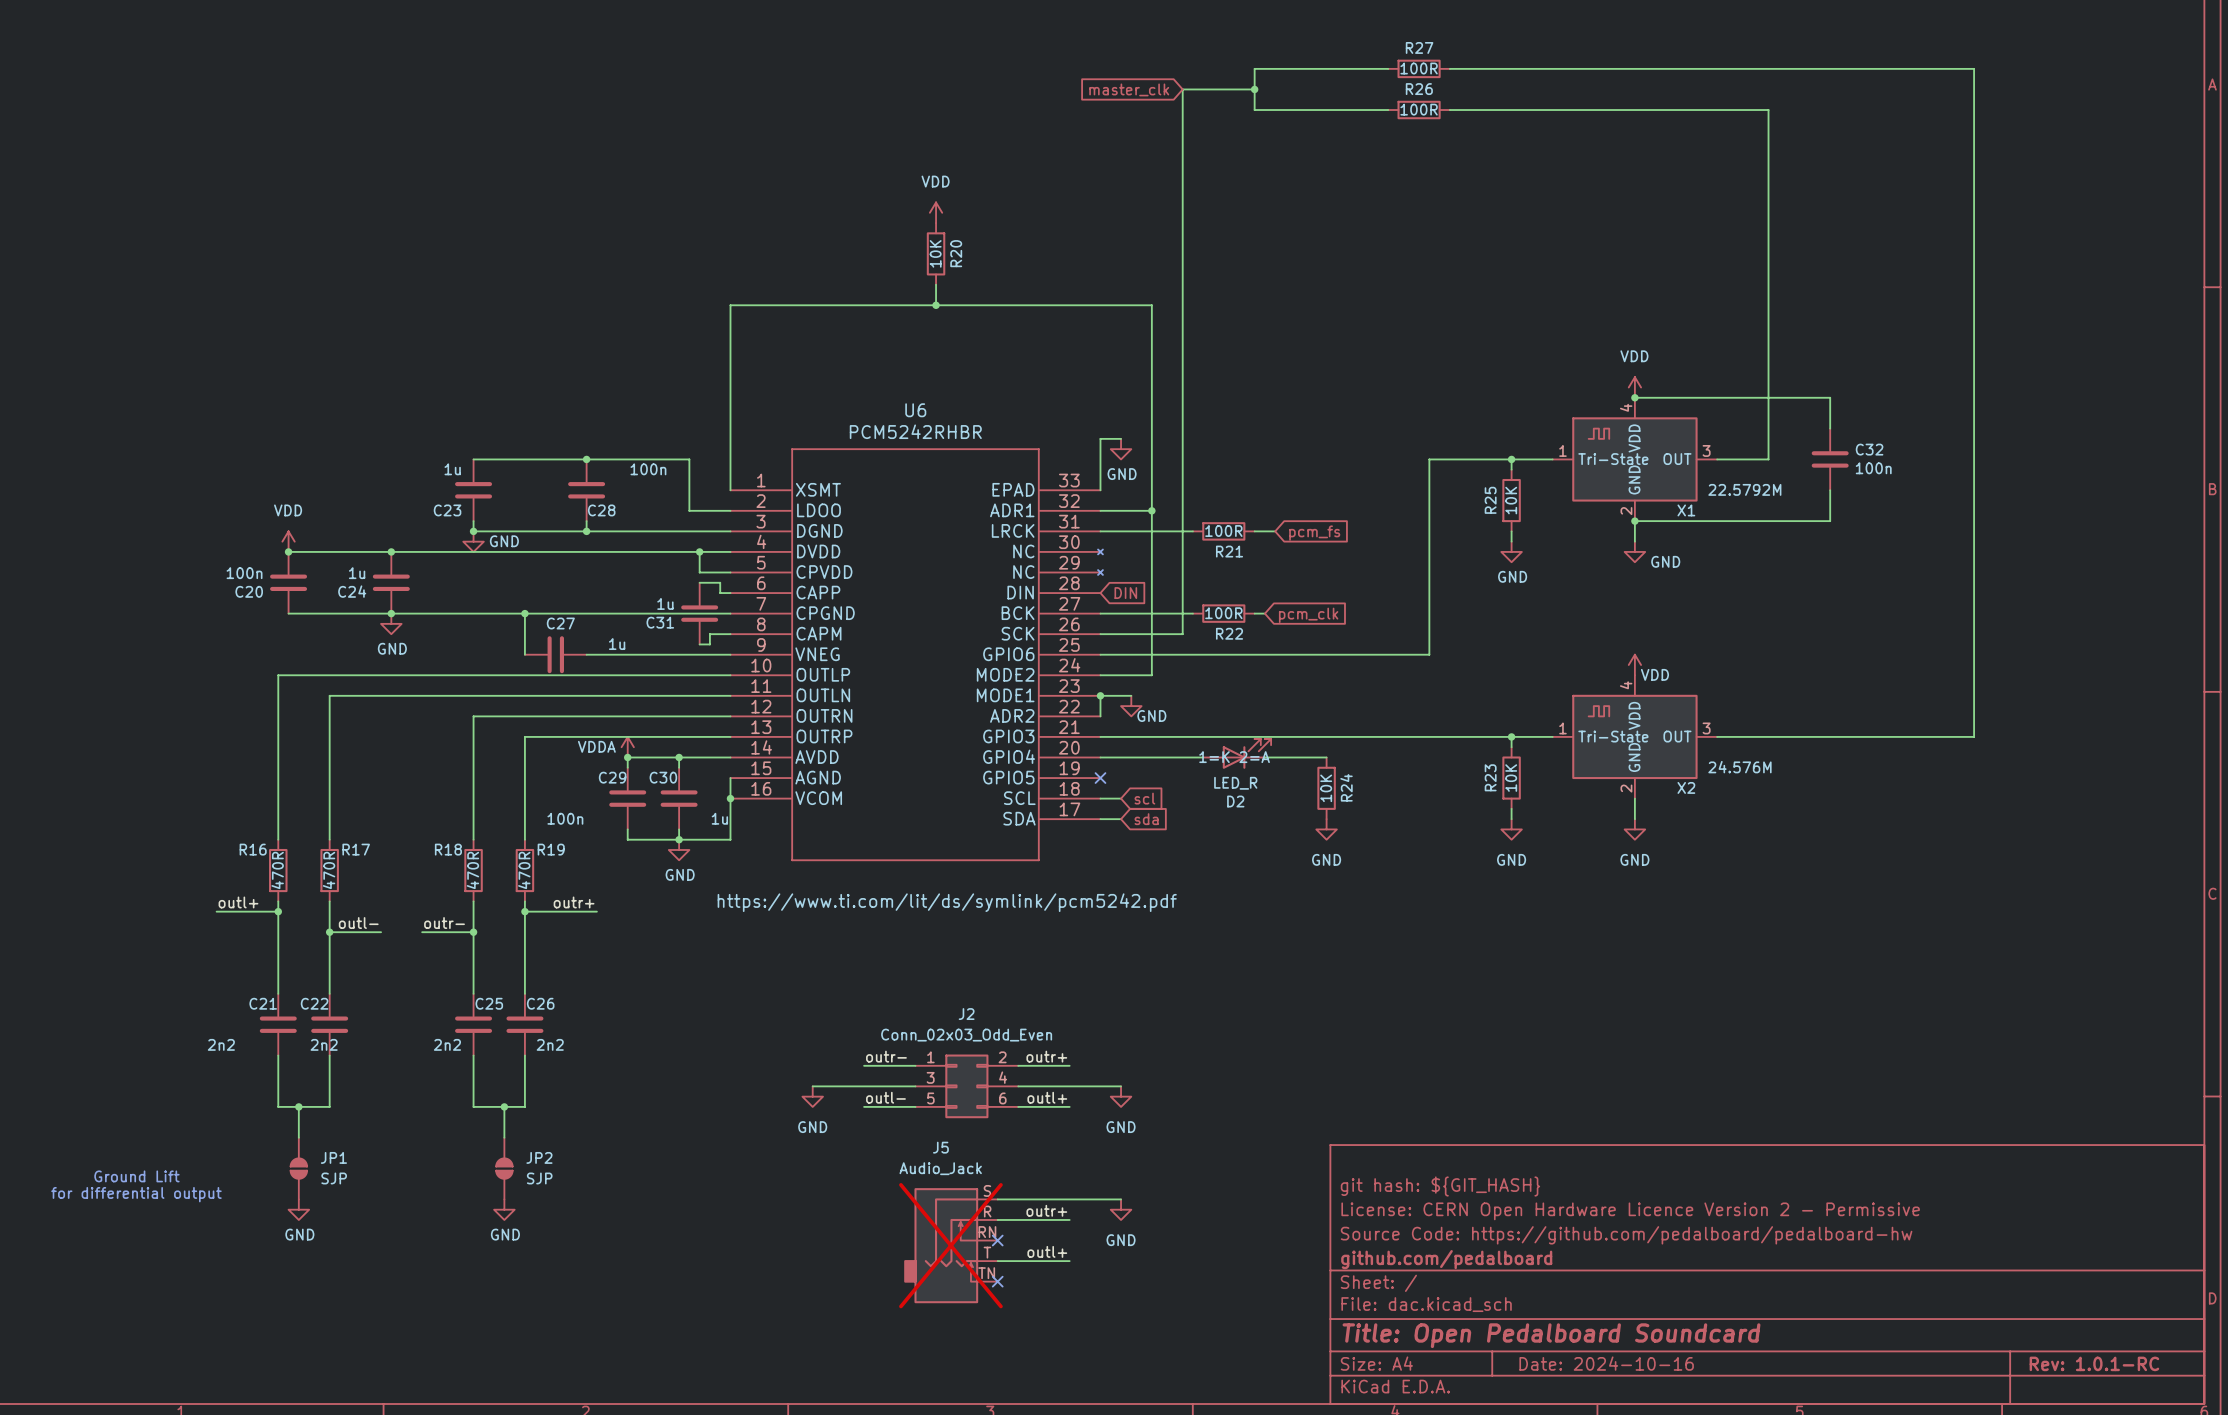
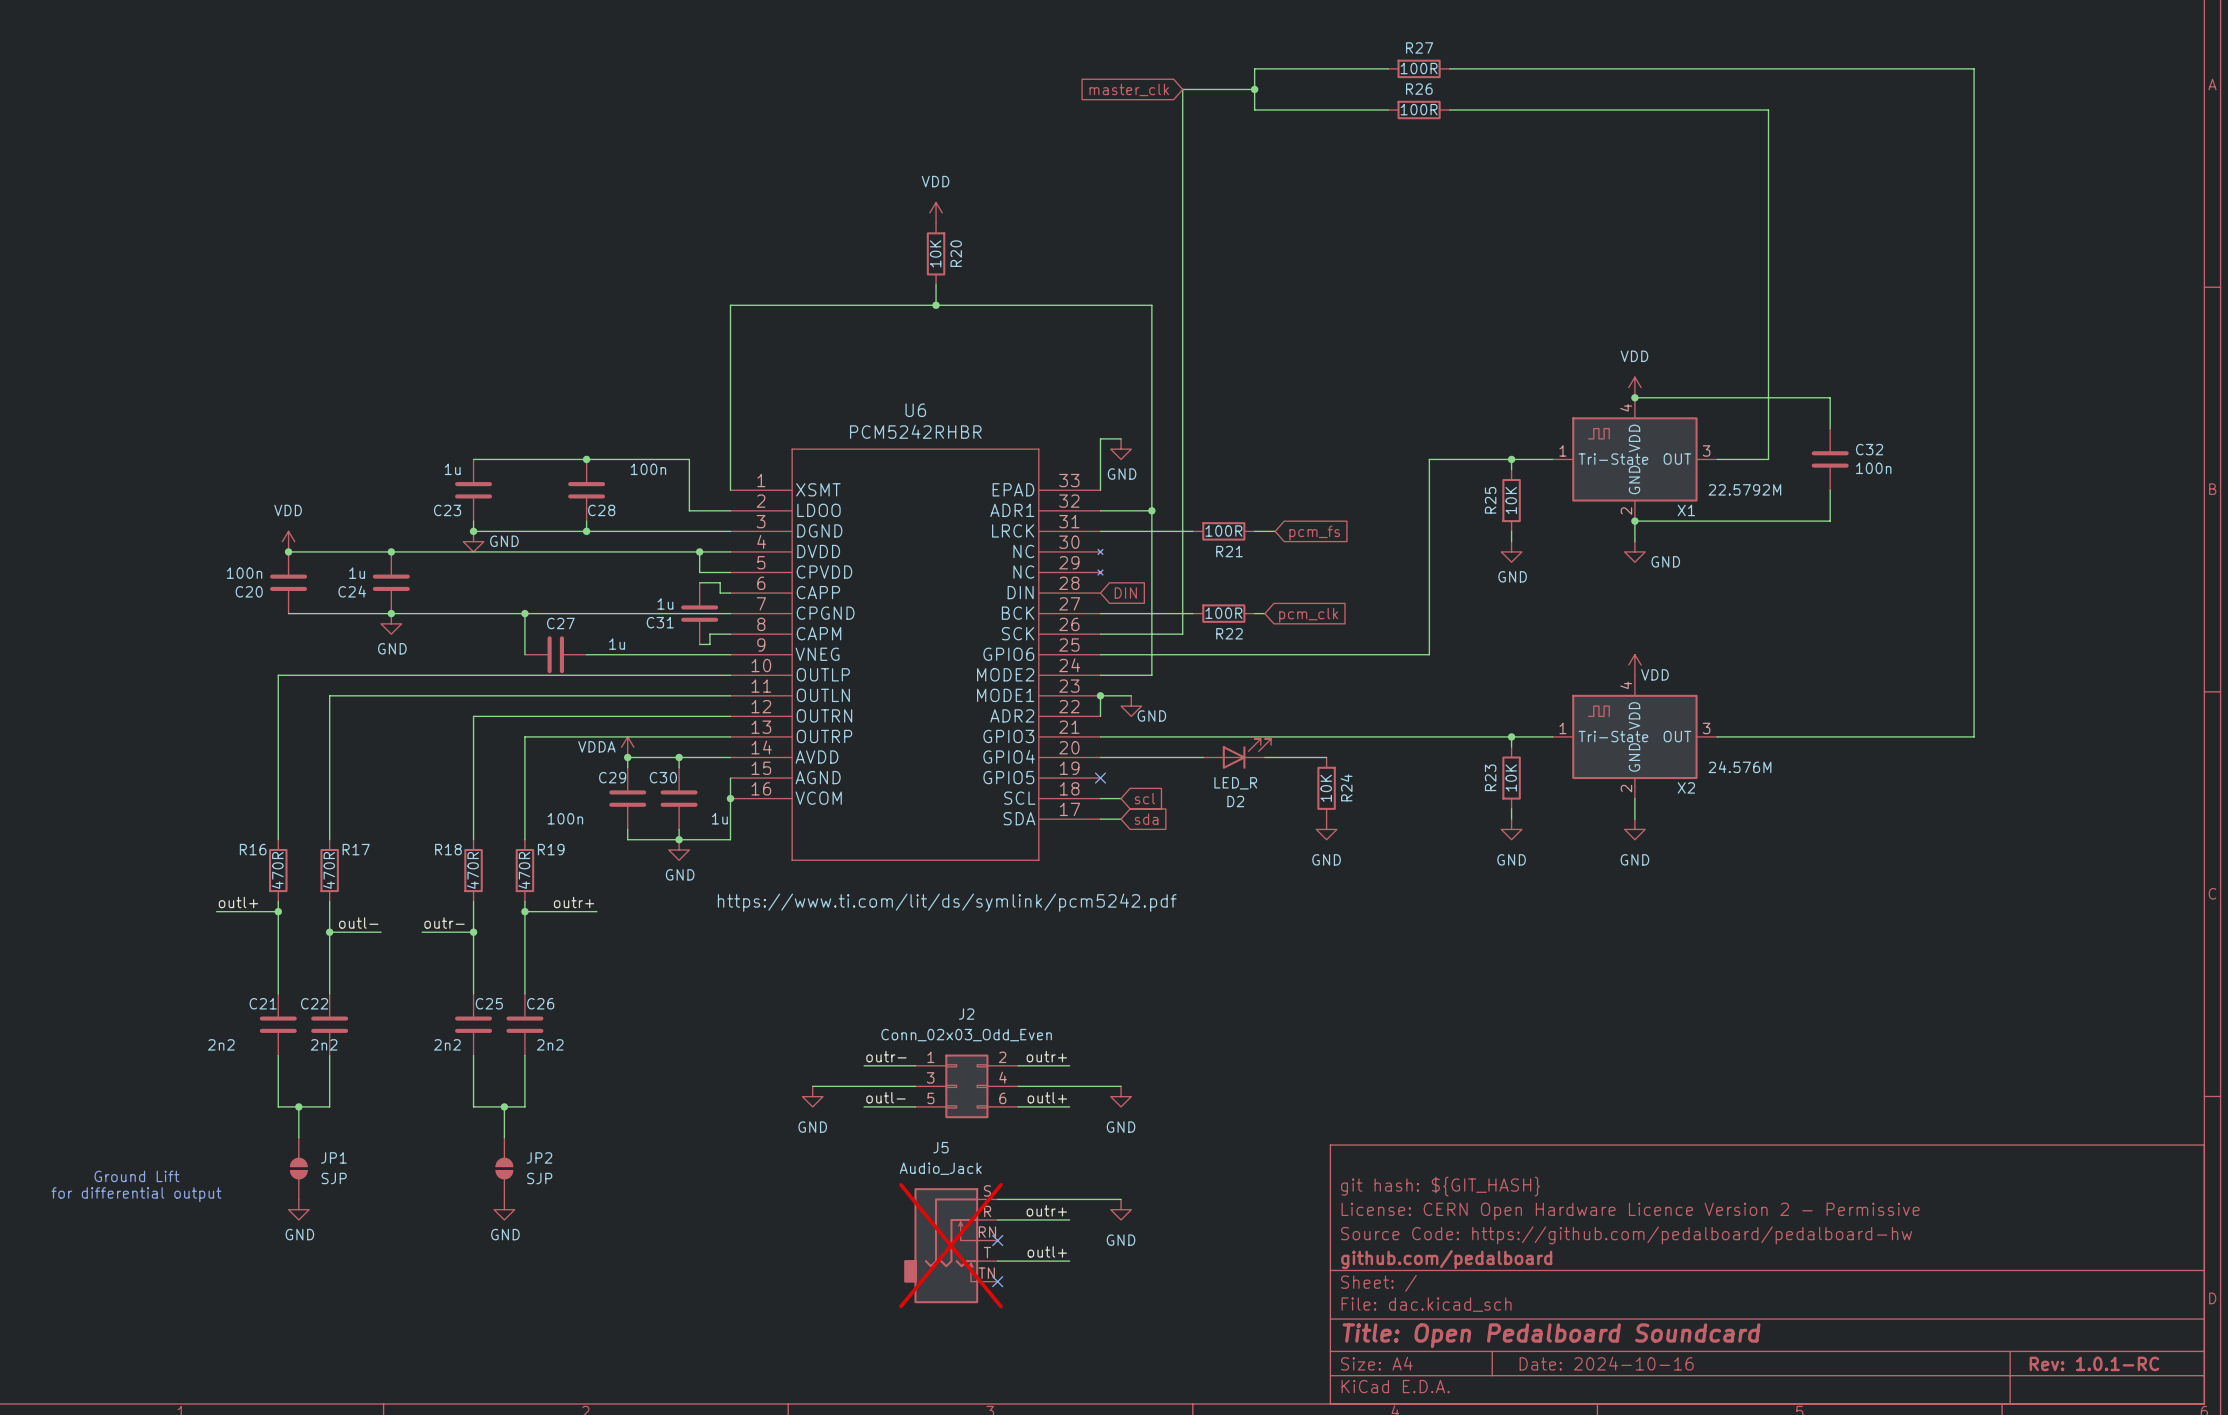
D2 text: 1=K 2=A (1234, 757) -> none

